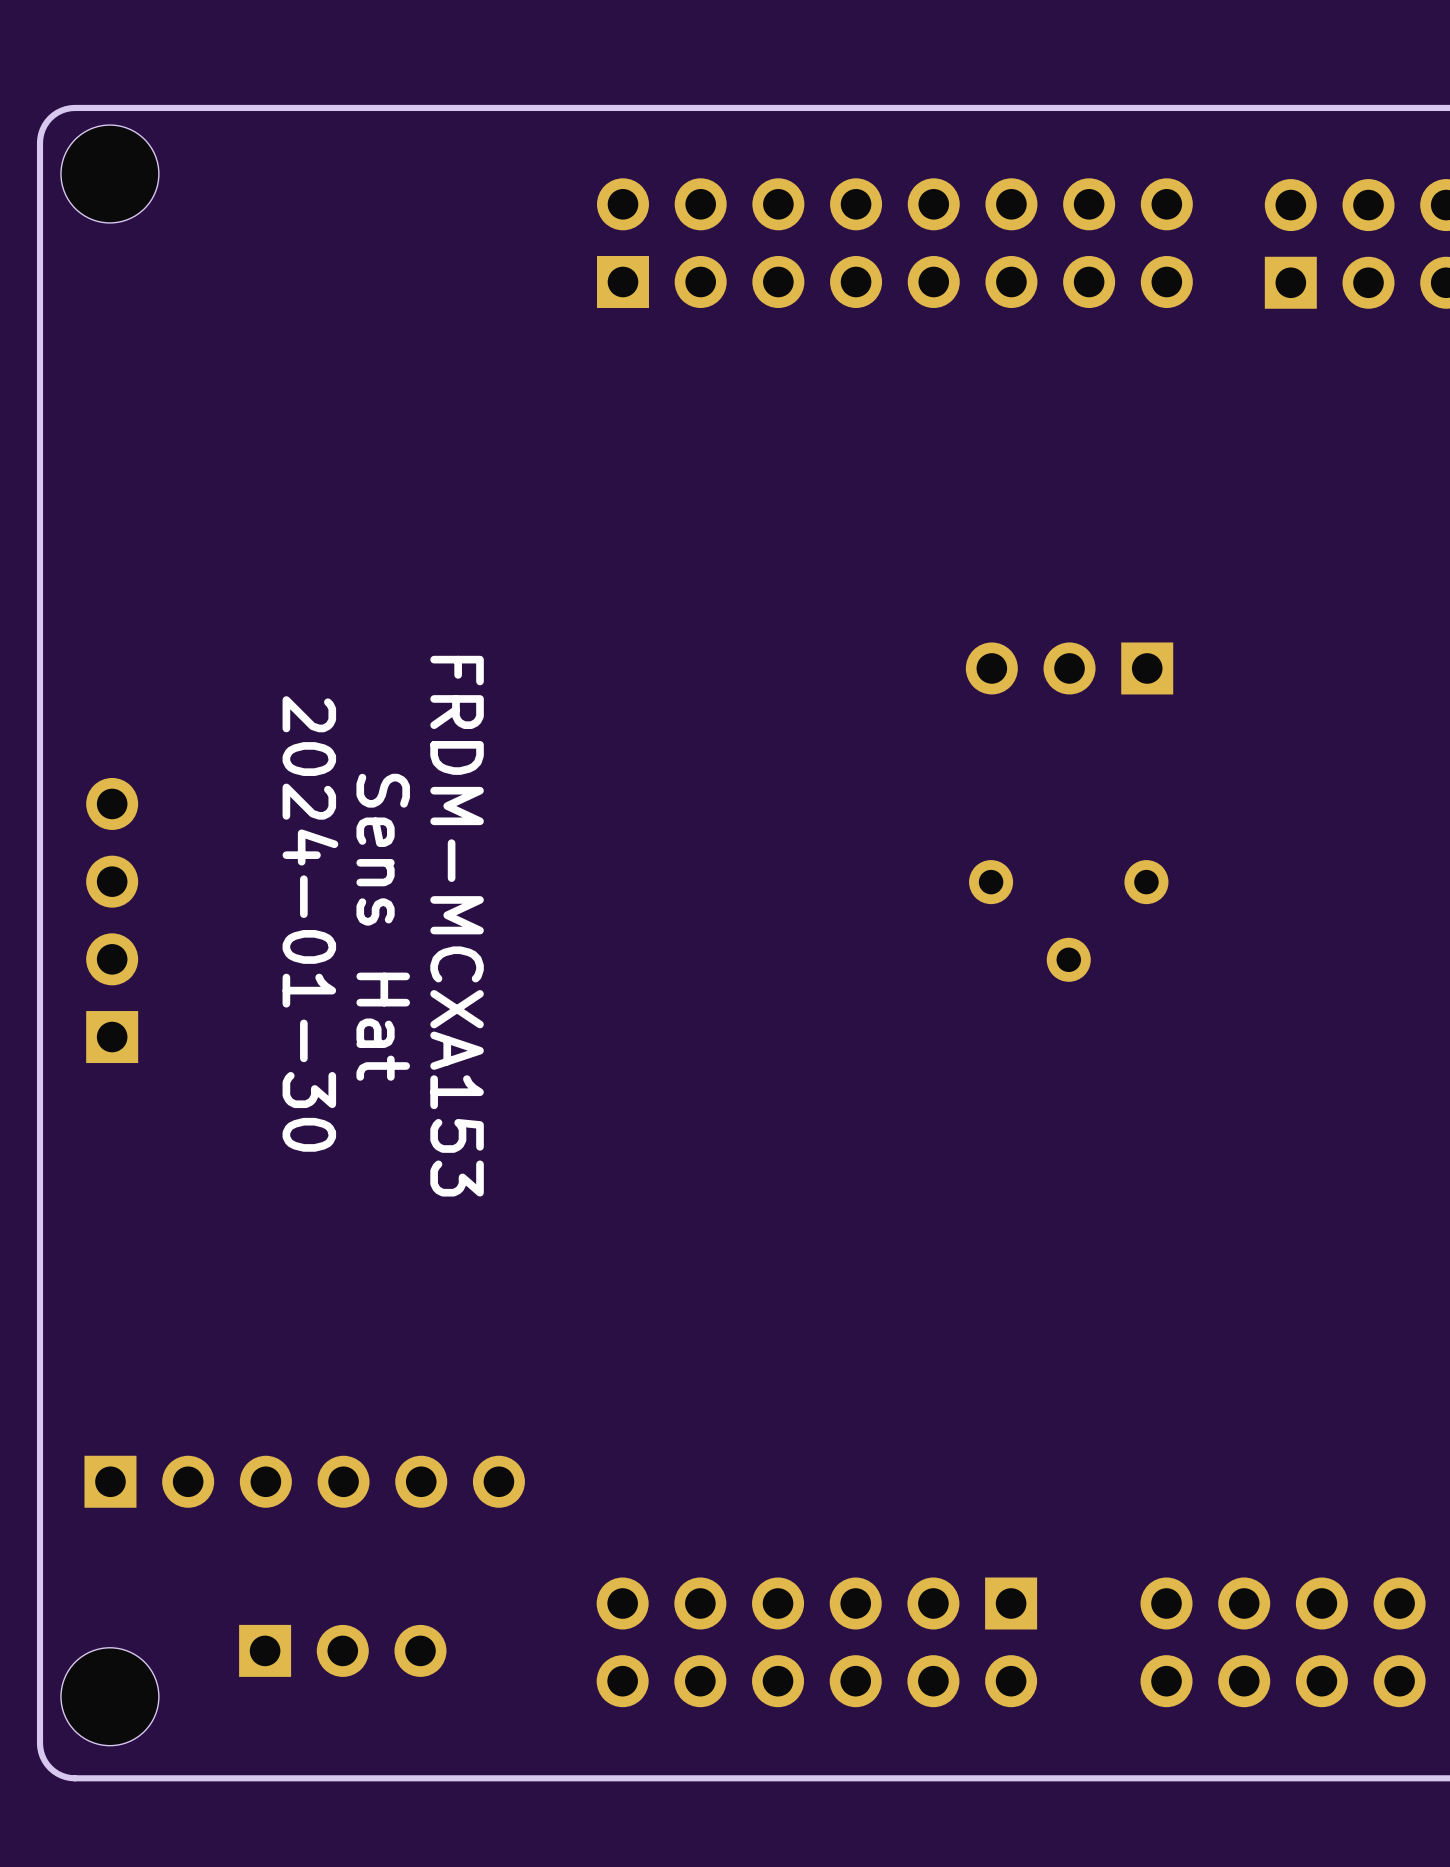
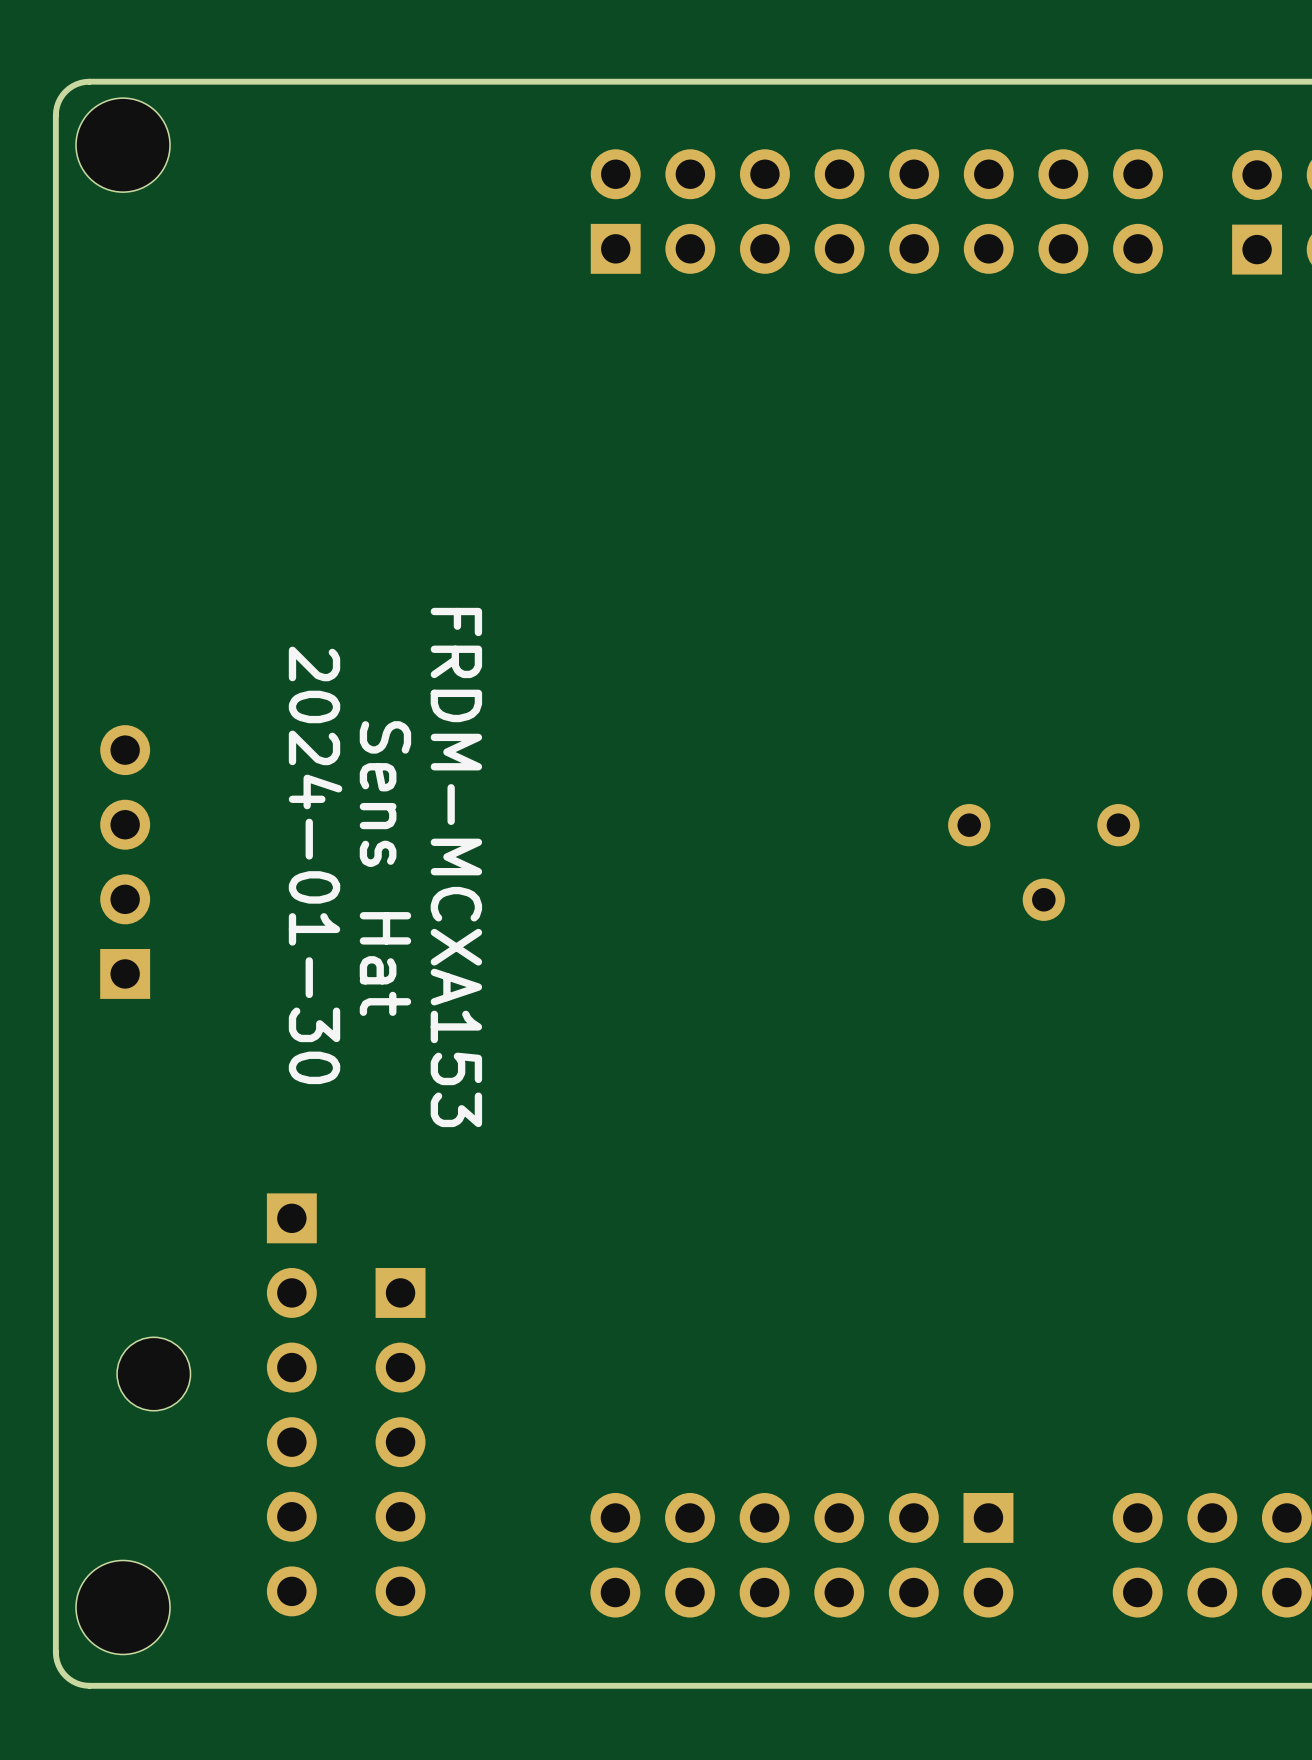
part: (1069, 668) -> none
part: none -> (153, 1374)
part rotation: 0° (304, 1481) -> 90° clockwise (291, 1404)
part: none -> (400, 1442)
part: (342, 1650) -> none

